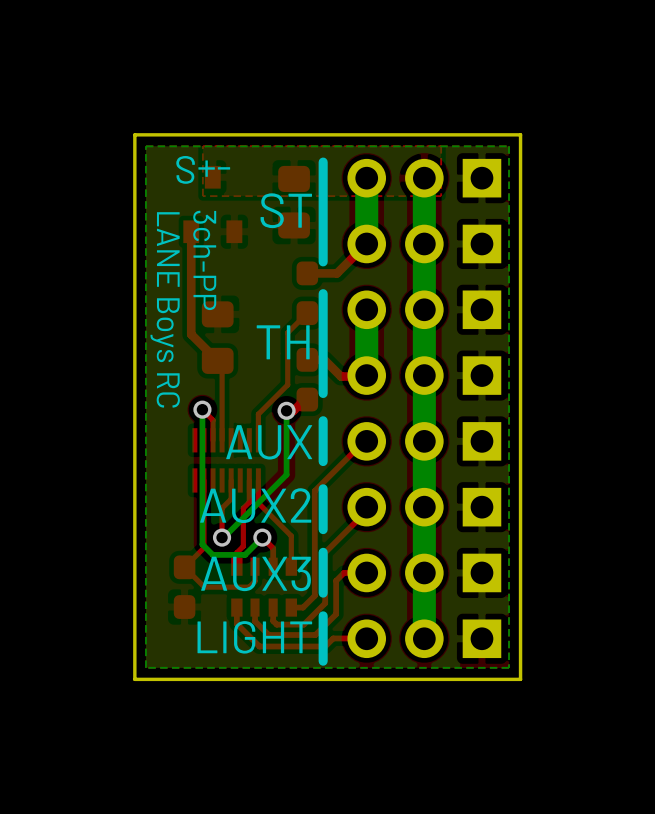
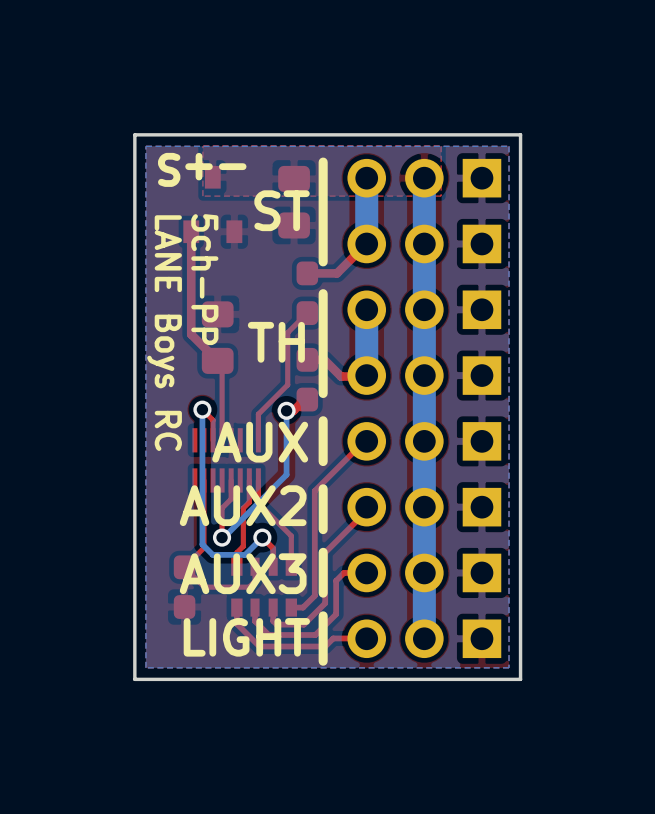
text: 3ch-PP (204, 260) -> 5ch-PP (204, 279)

